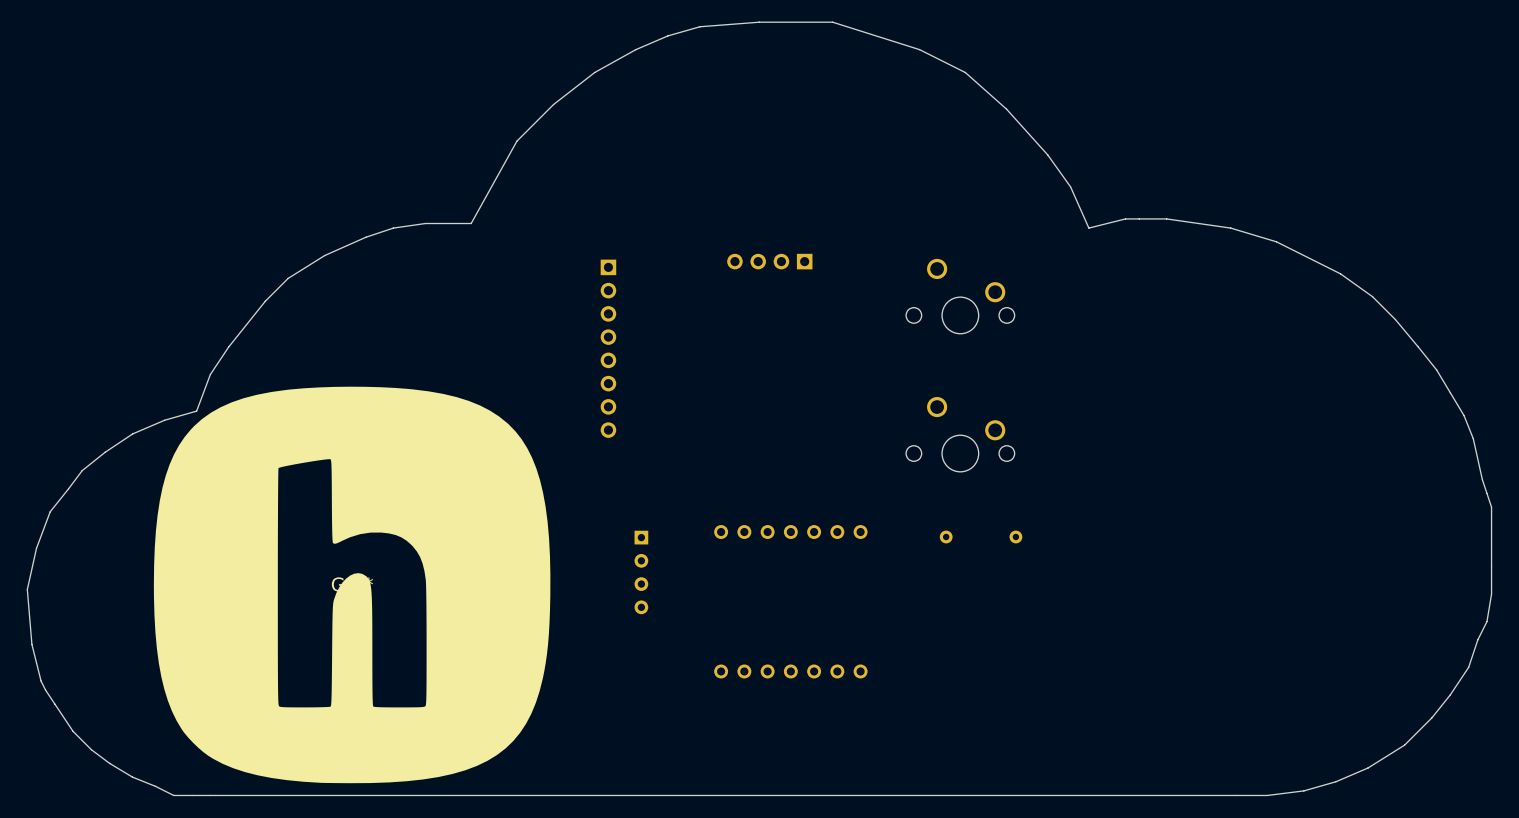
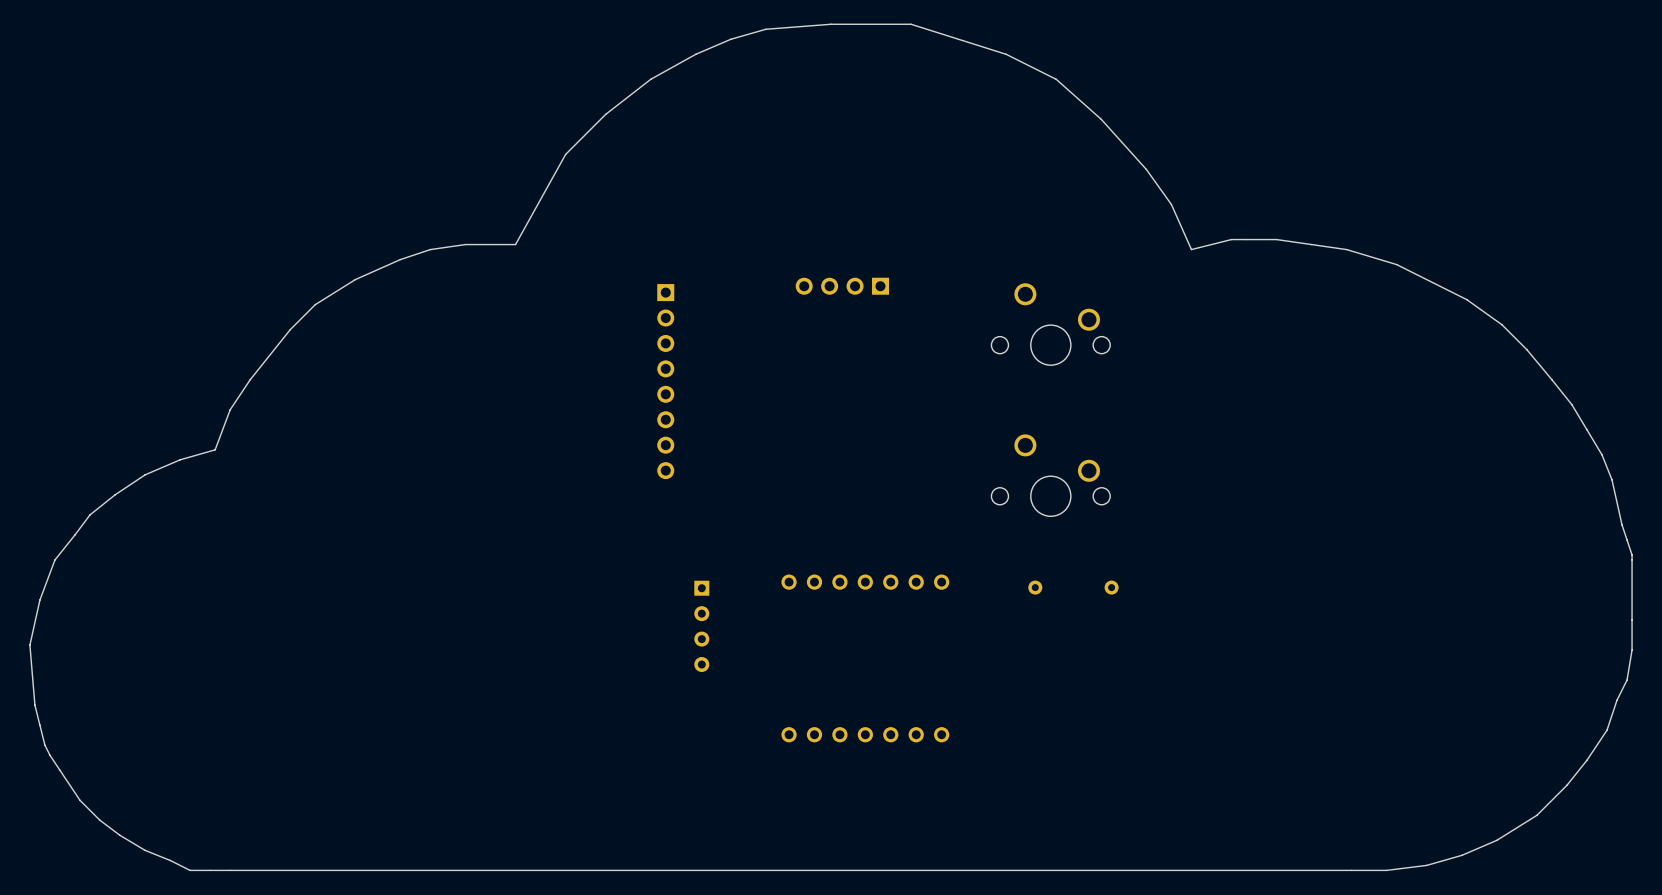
part: (352, 584) -> none

